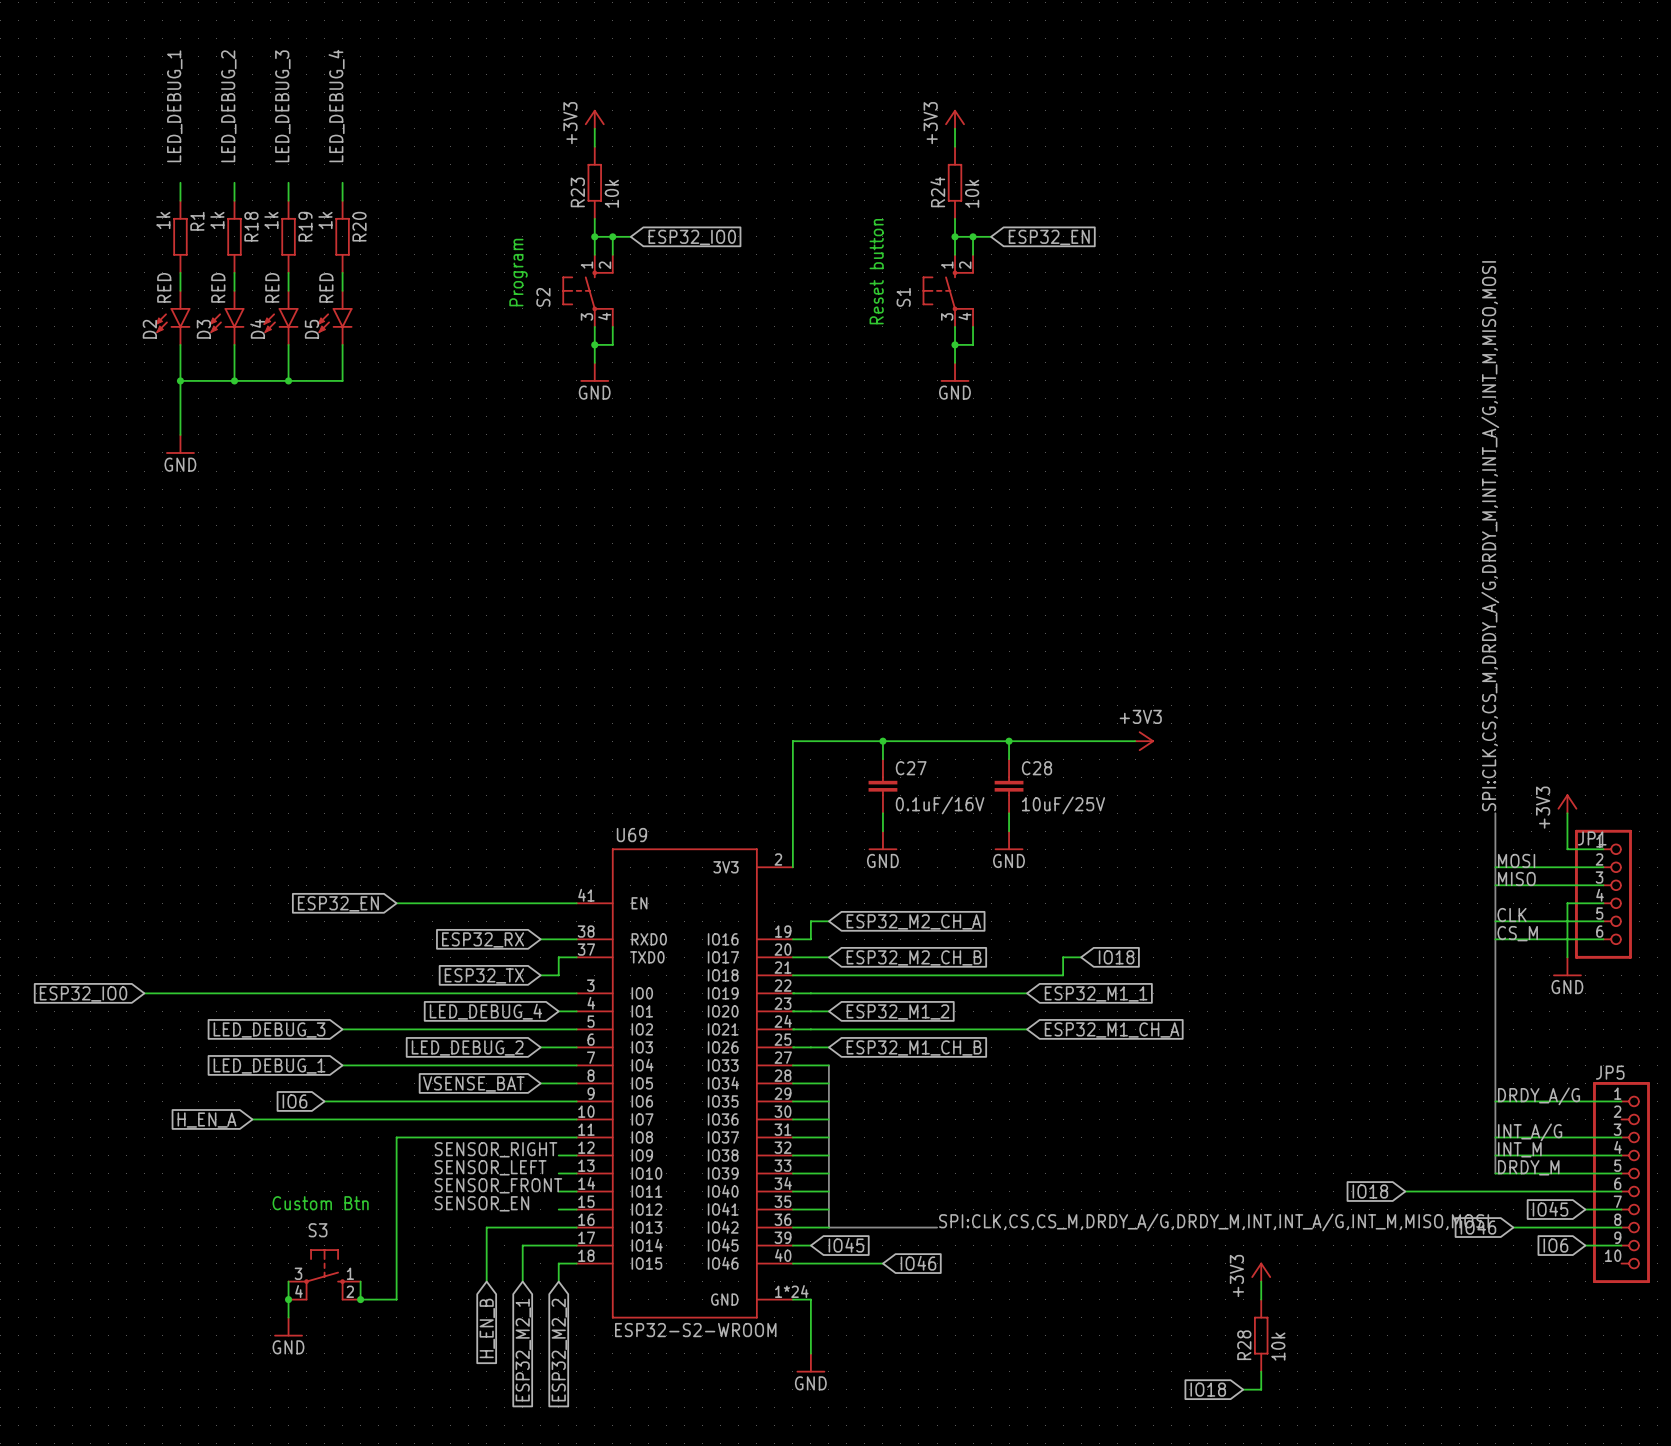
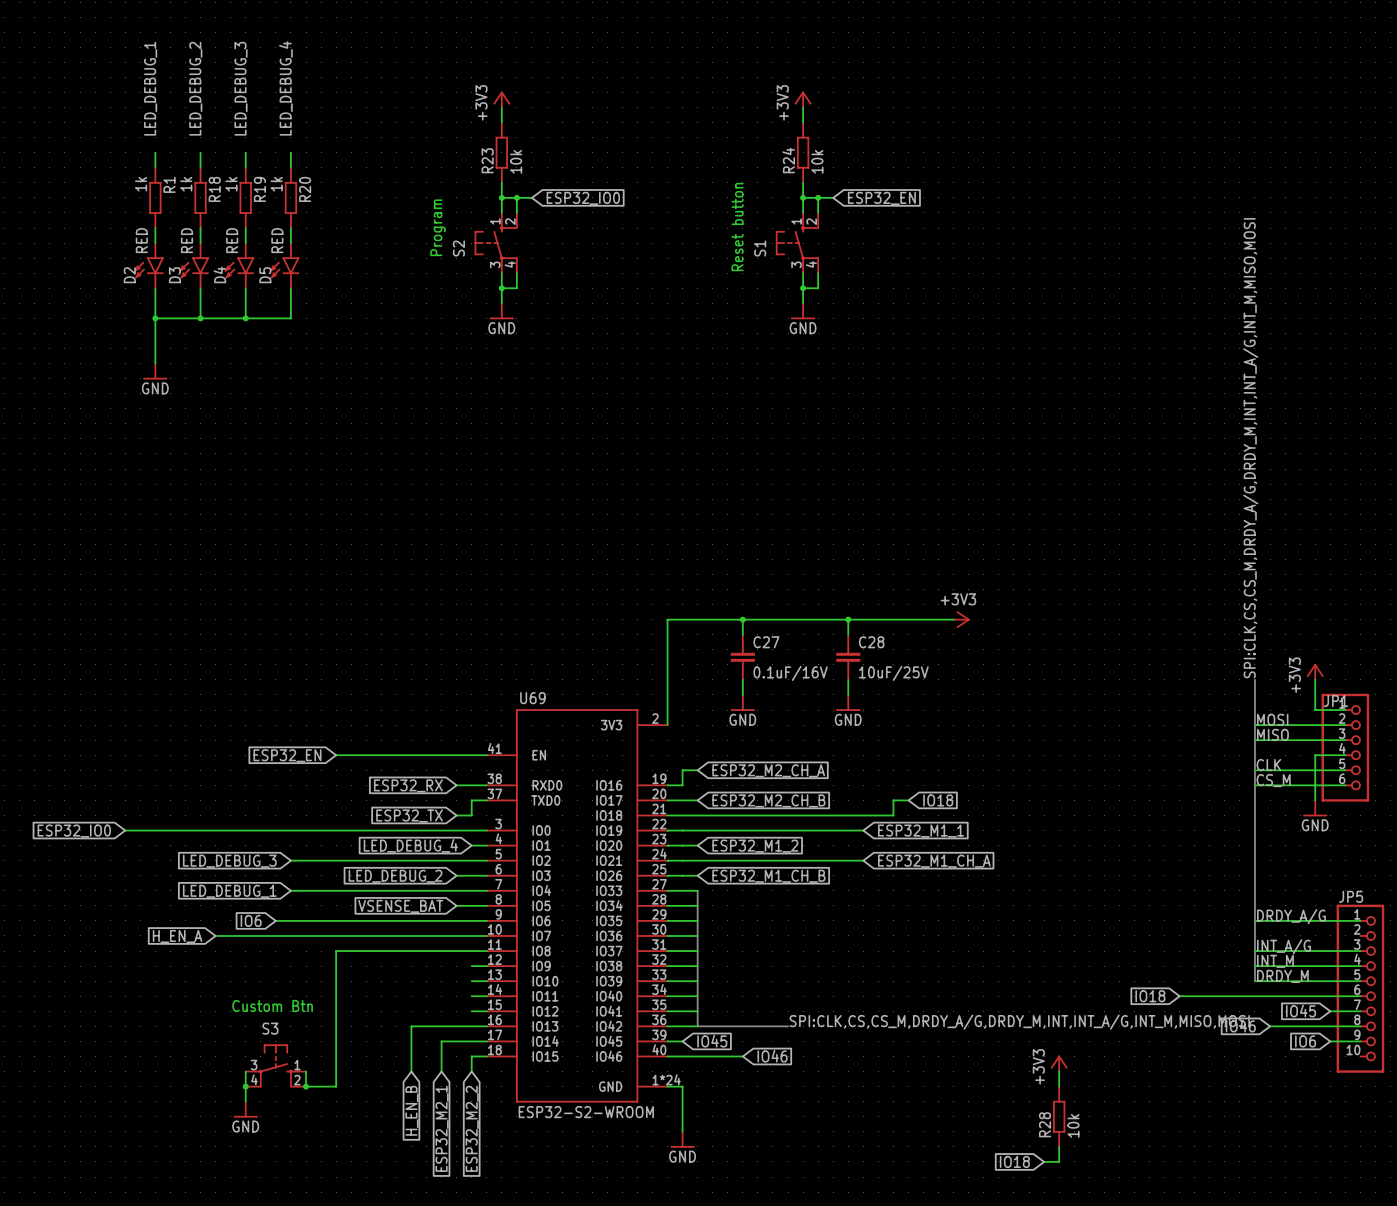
label: SENSOR_RIGHT (495, 1149) -> none
label: SENSOR_LEFT (490, 1167) -> none
label: SENSOR_FRONT (498, 1185) -> none
label: SENSOR_EN (481, 1203) -> none

